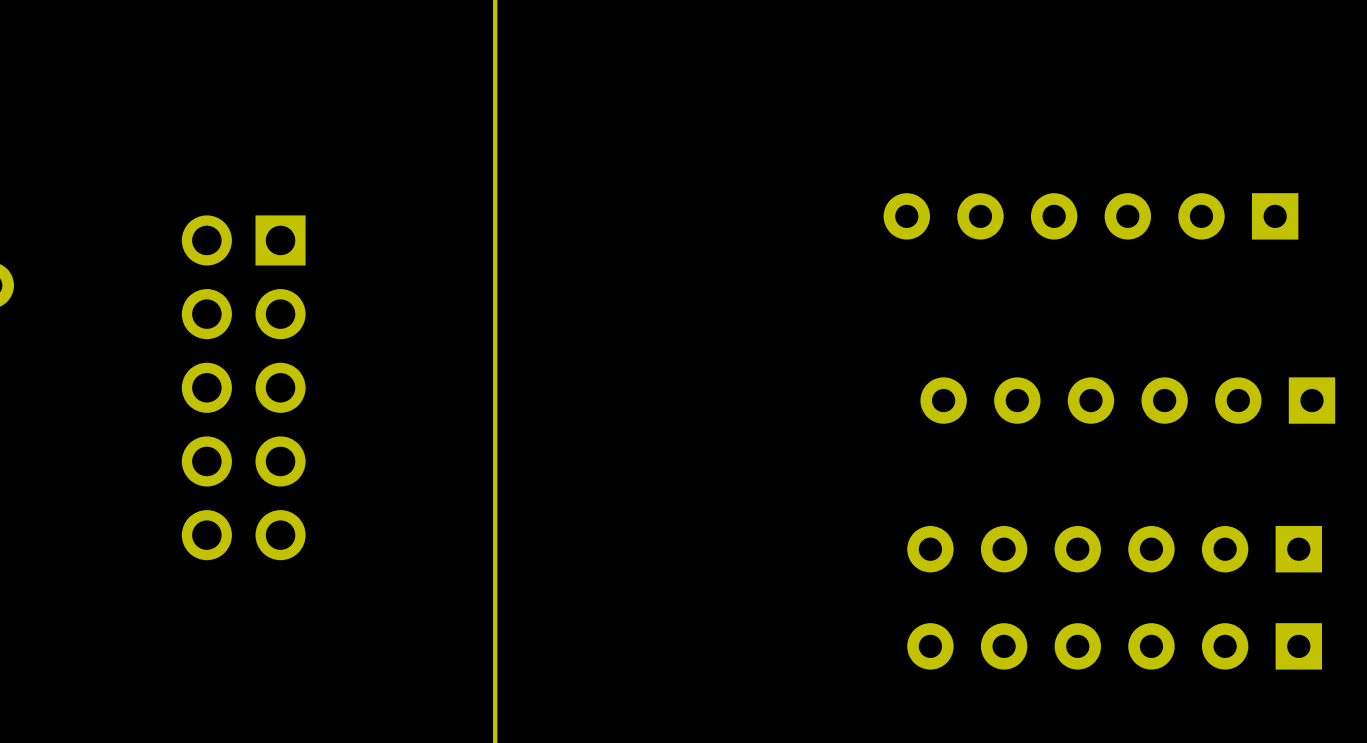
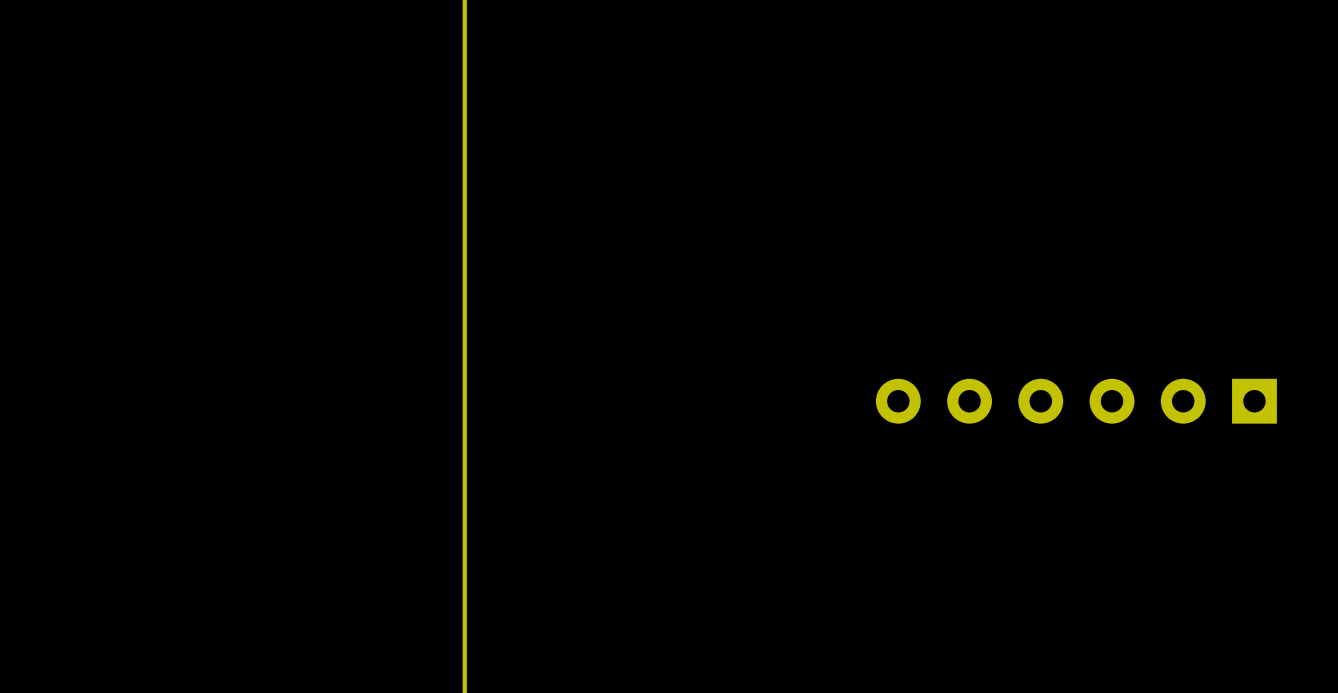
part: (1090, 216) -> none
part: (243, 387) -> none
part: (1114, 549) -> none
part: (1114, 646) -> none

